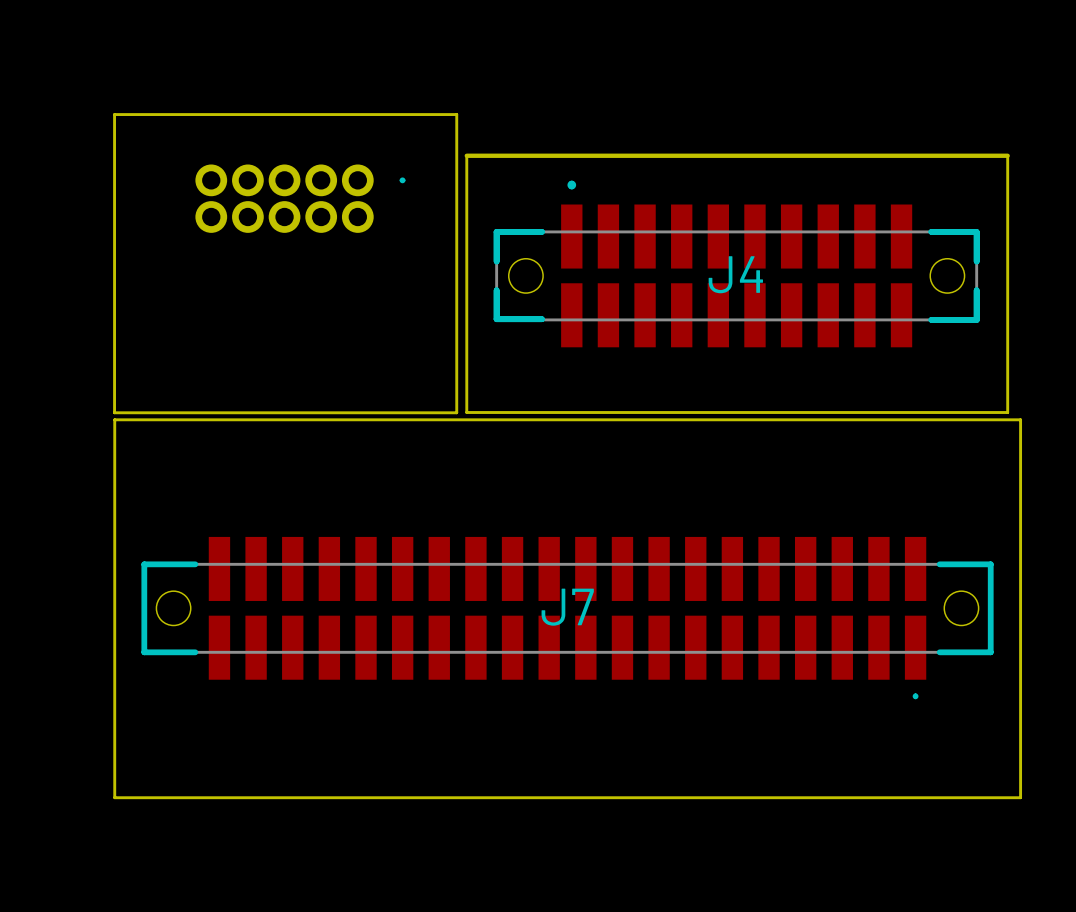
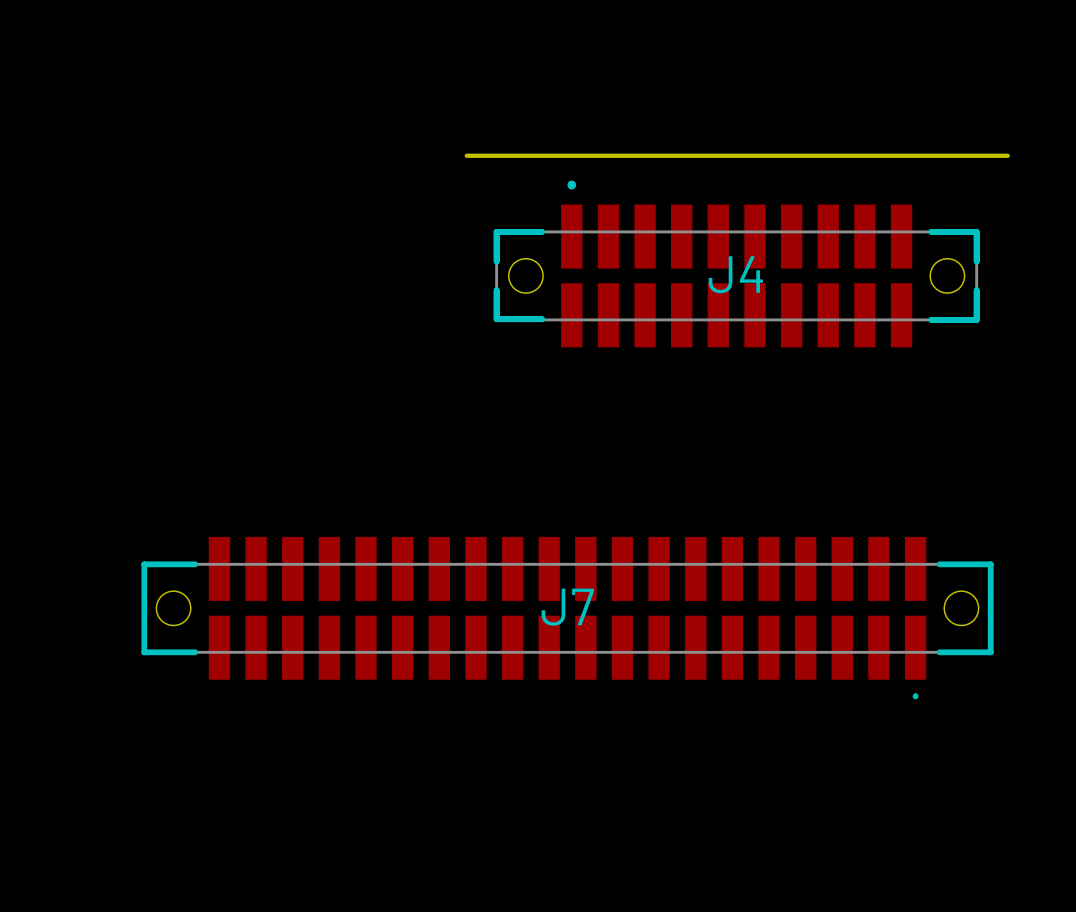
board edge: (114, 114) (456, 114) (456, 412) (114, 412) (114, 114) -> none
board edge: (466, 155) (466, 412) (1007, 412) (1007, 155) (466, 155) -> none
part: (300, 198) -> none
board edge: (114, 419) (114, 797) (1020, 797) (1020, 419) (114, 419) -> none

